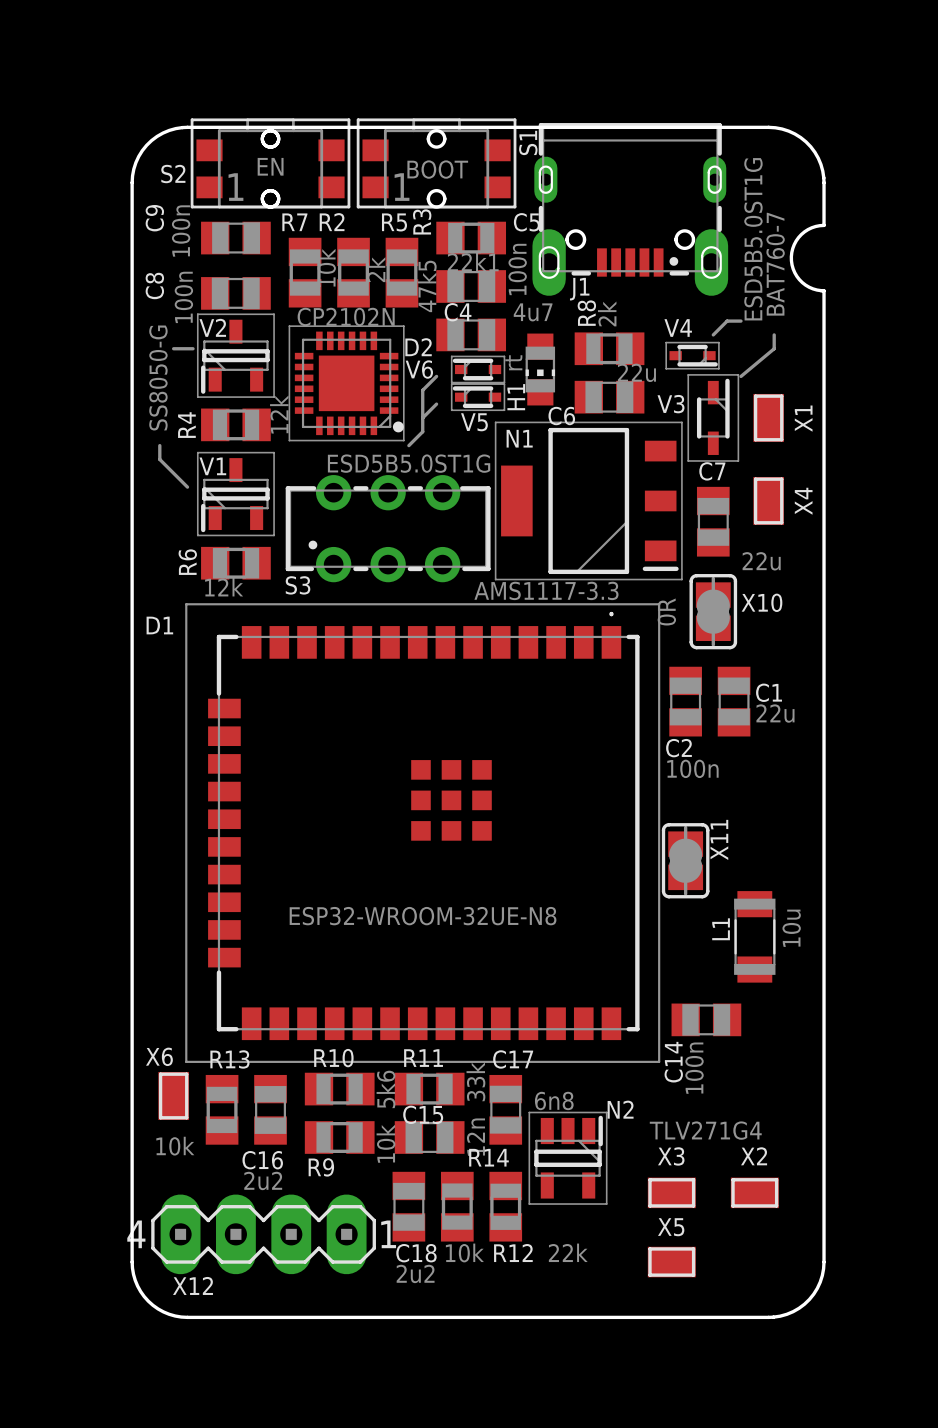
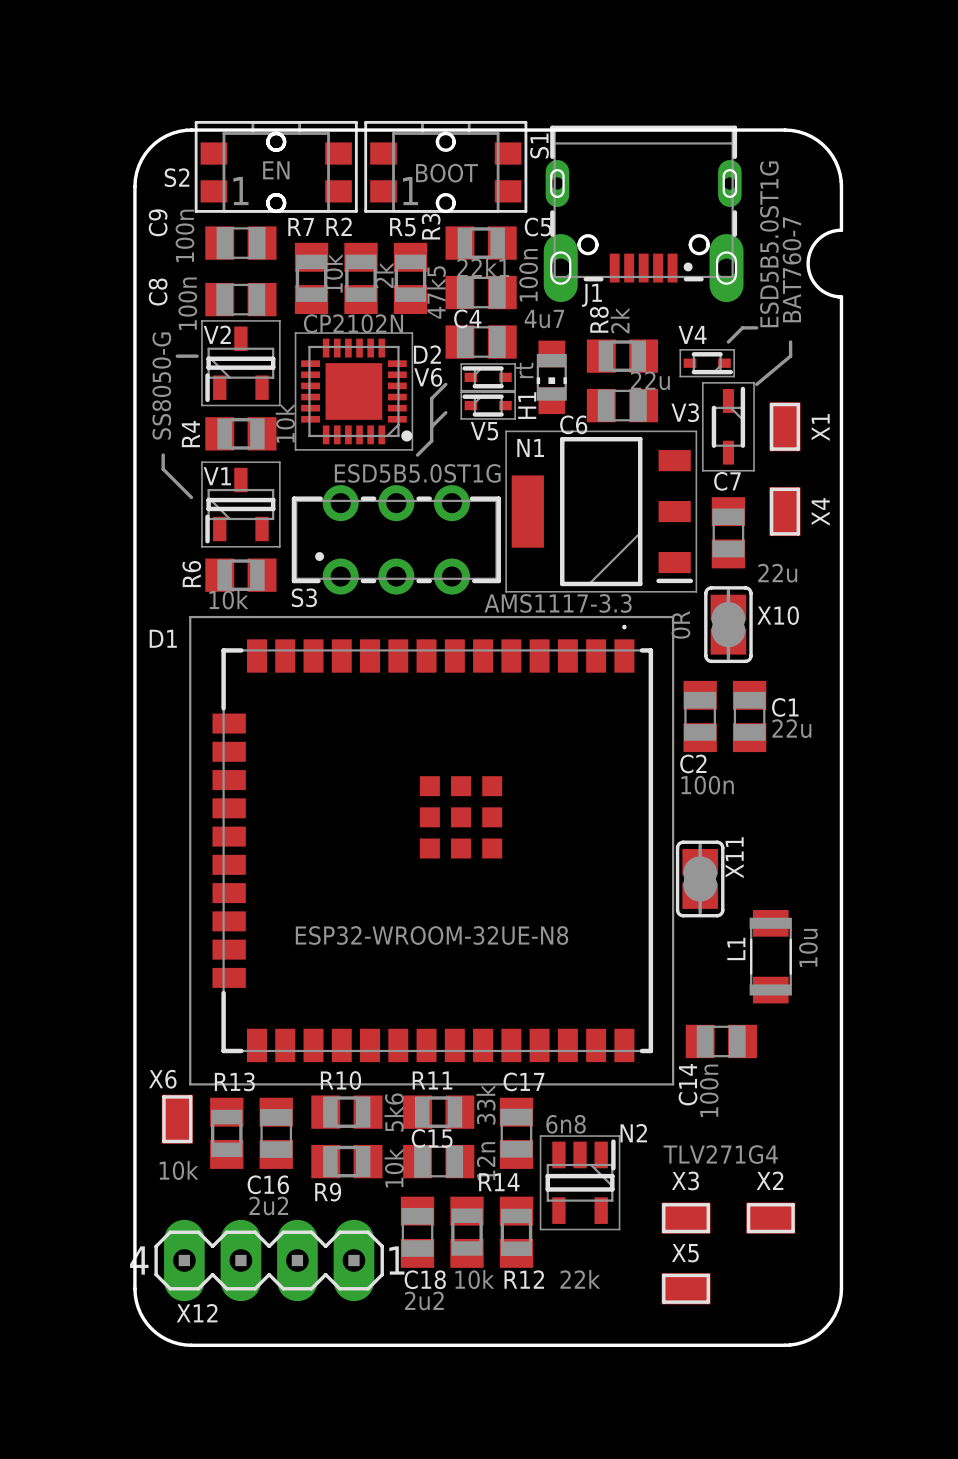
R4 value: 12k (279, 414) -> 10k (285, 423)
R6 value: 12k (224, 587) -> 10k (228, 599)

